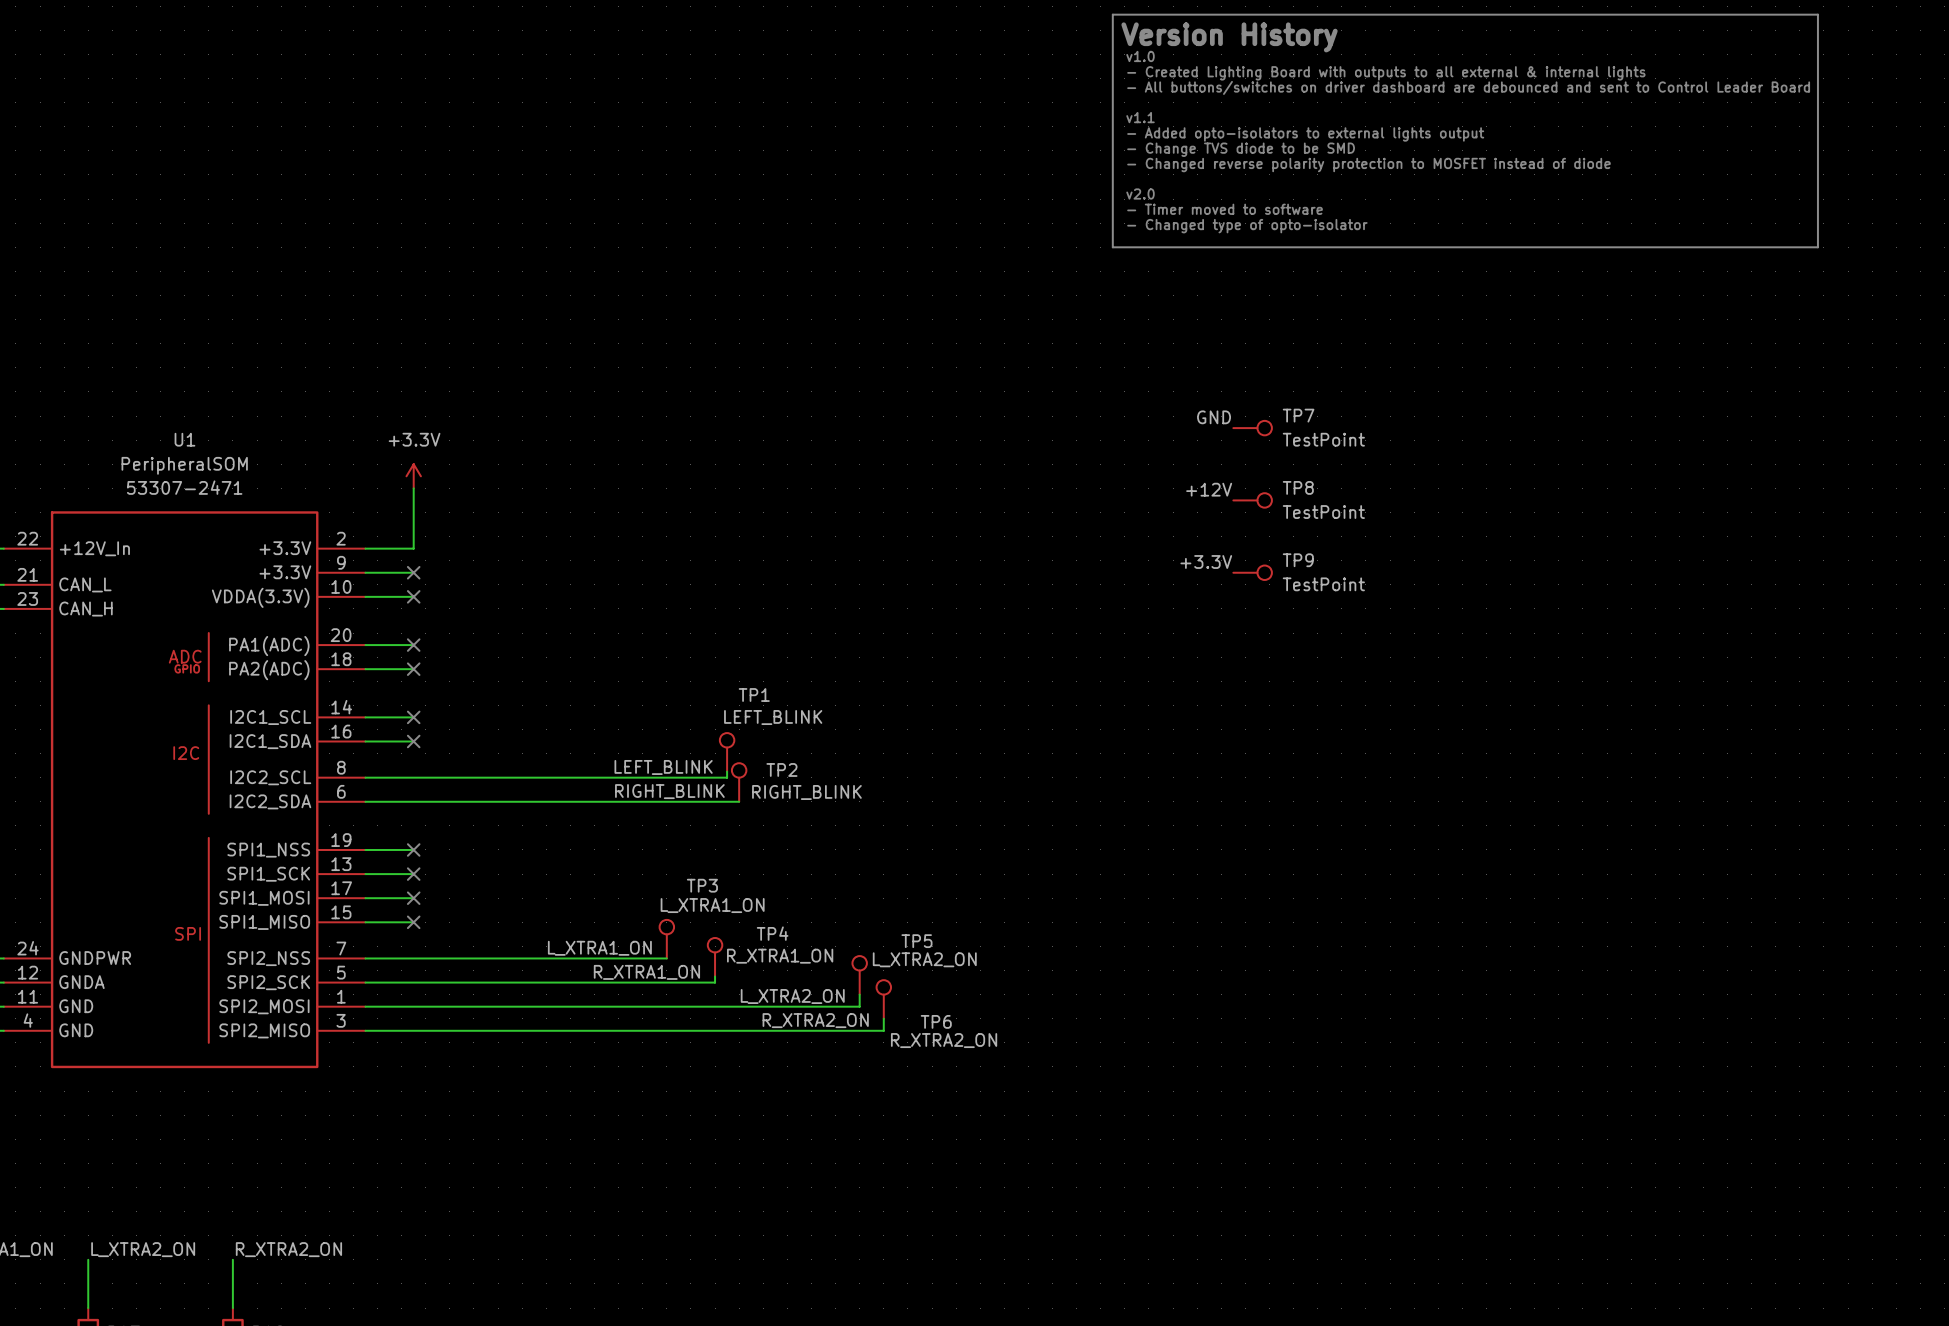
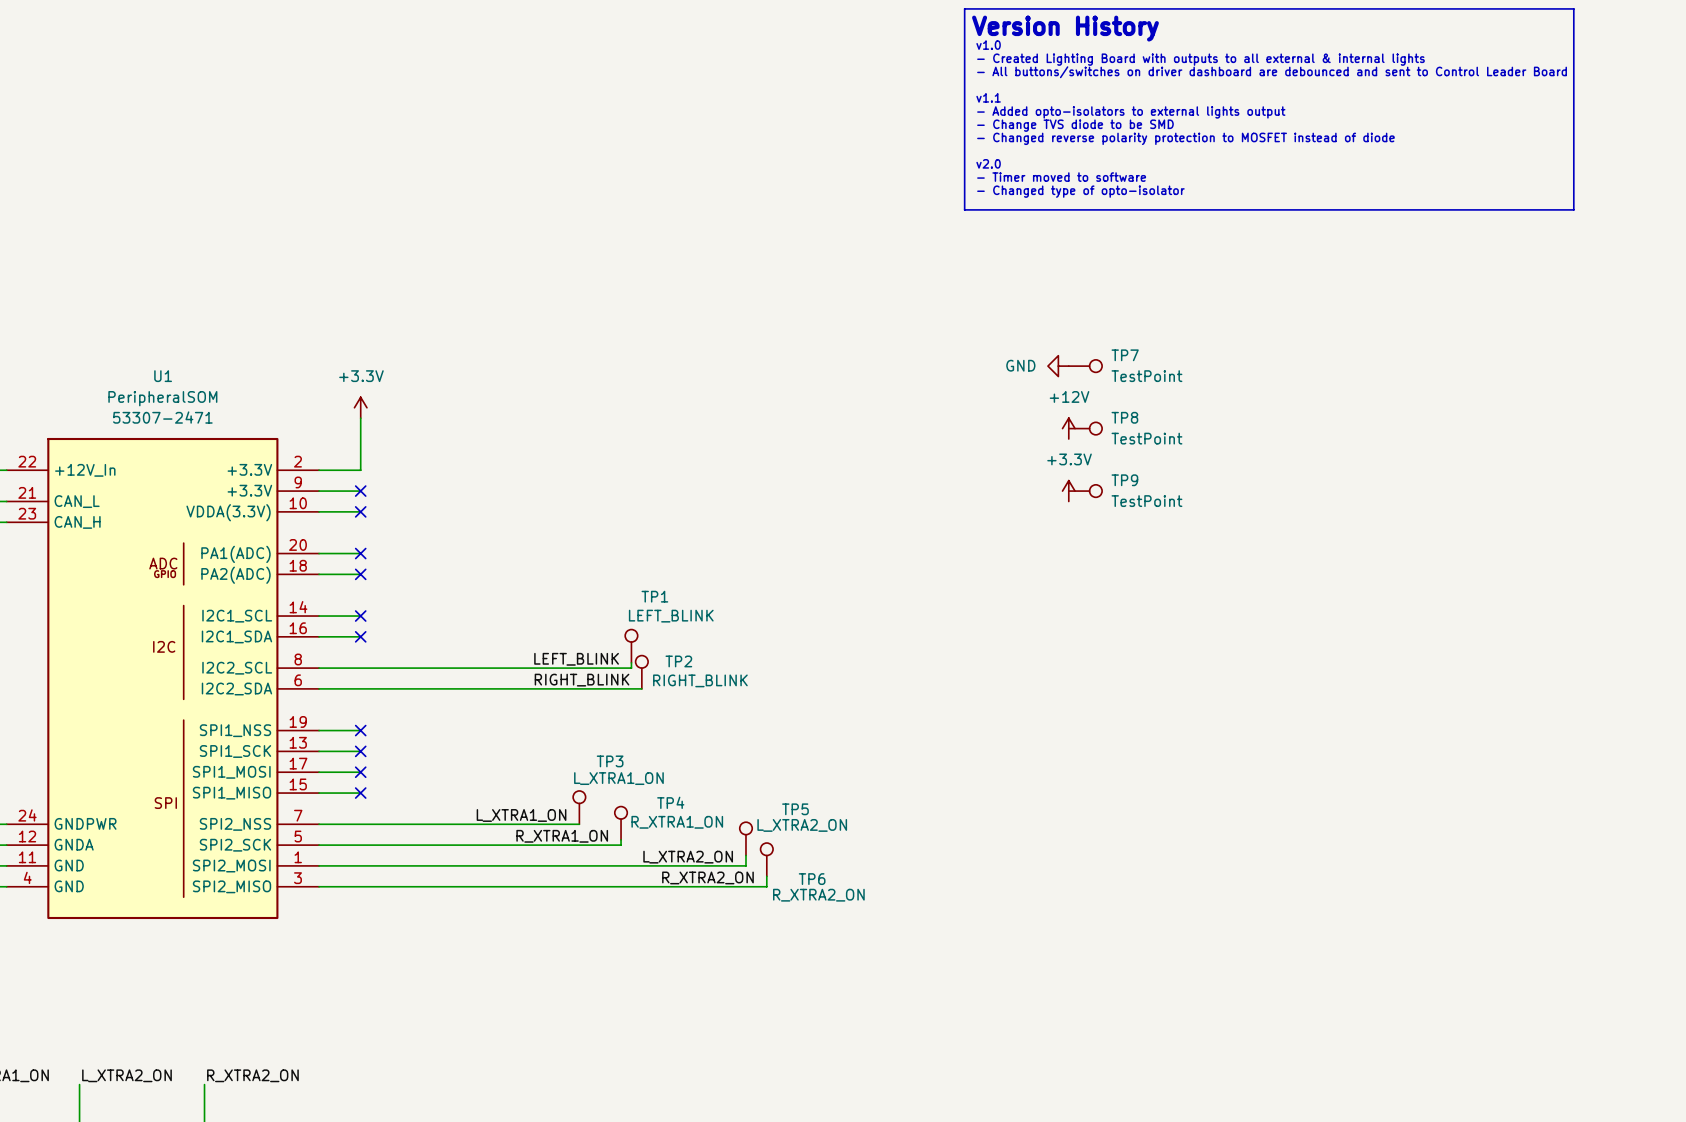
label: GND (1214, 417) -> none
power symbol: none -> GND (1058, 366)
label: +12V (1209, 489) -> none
power symbol: none -> +12V (1068, 428)
label: +3.3V (1206, 561) -> none
power symbol: none -> +3.3V (1068, 491)

